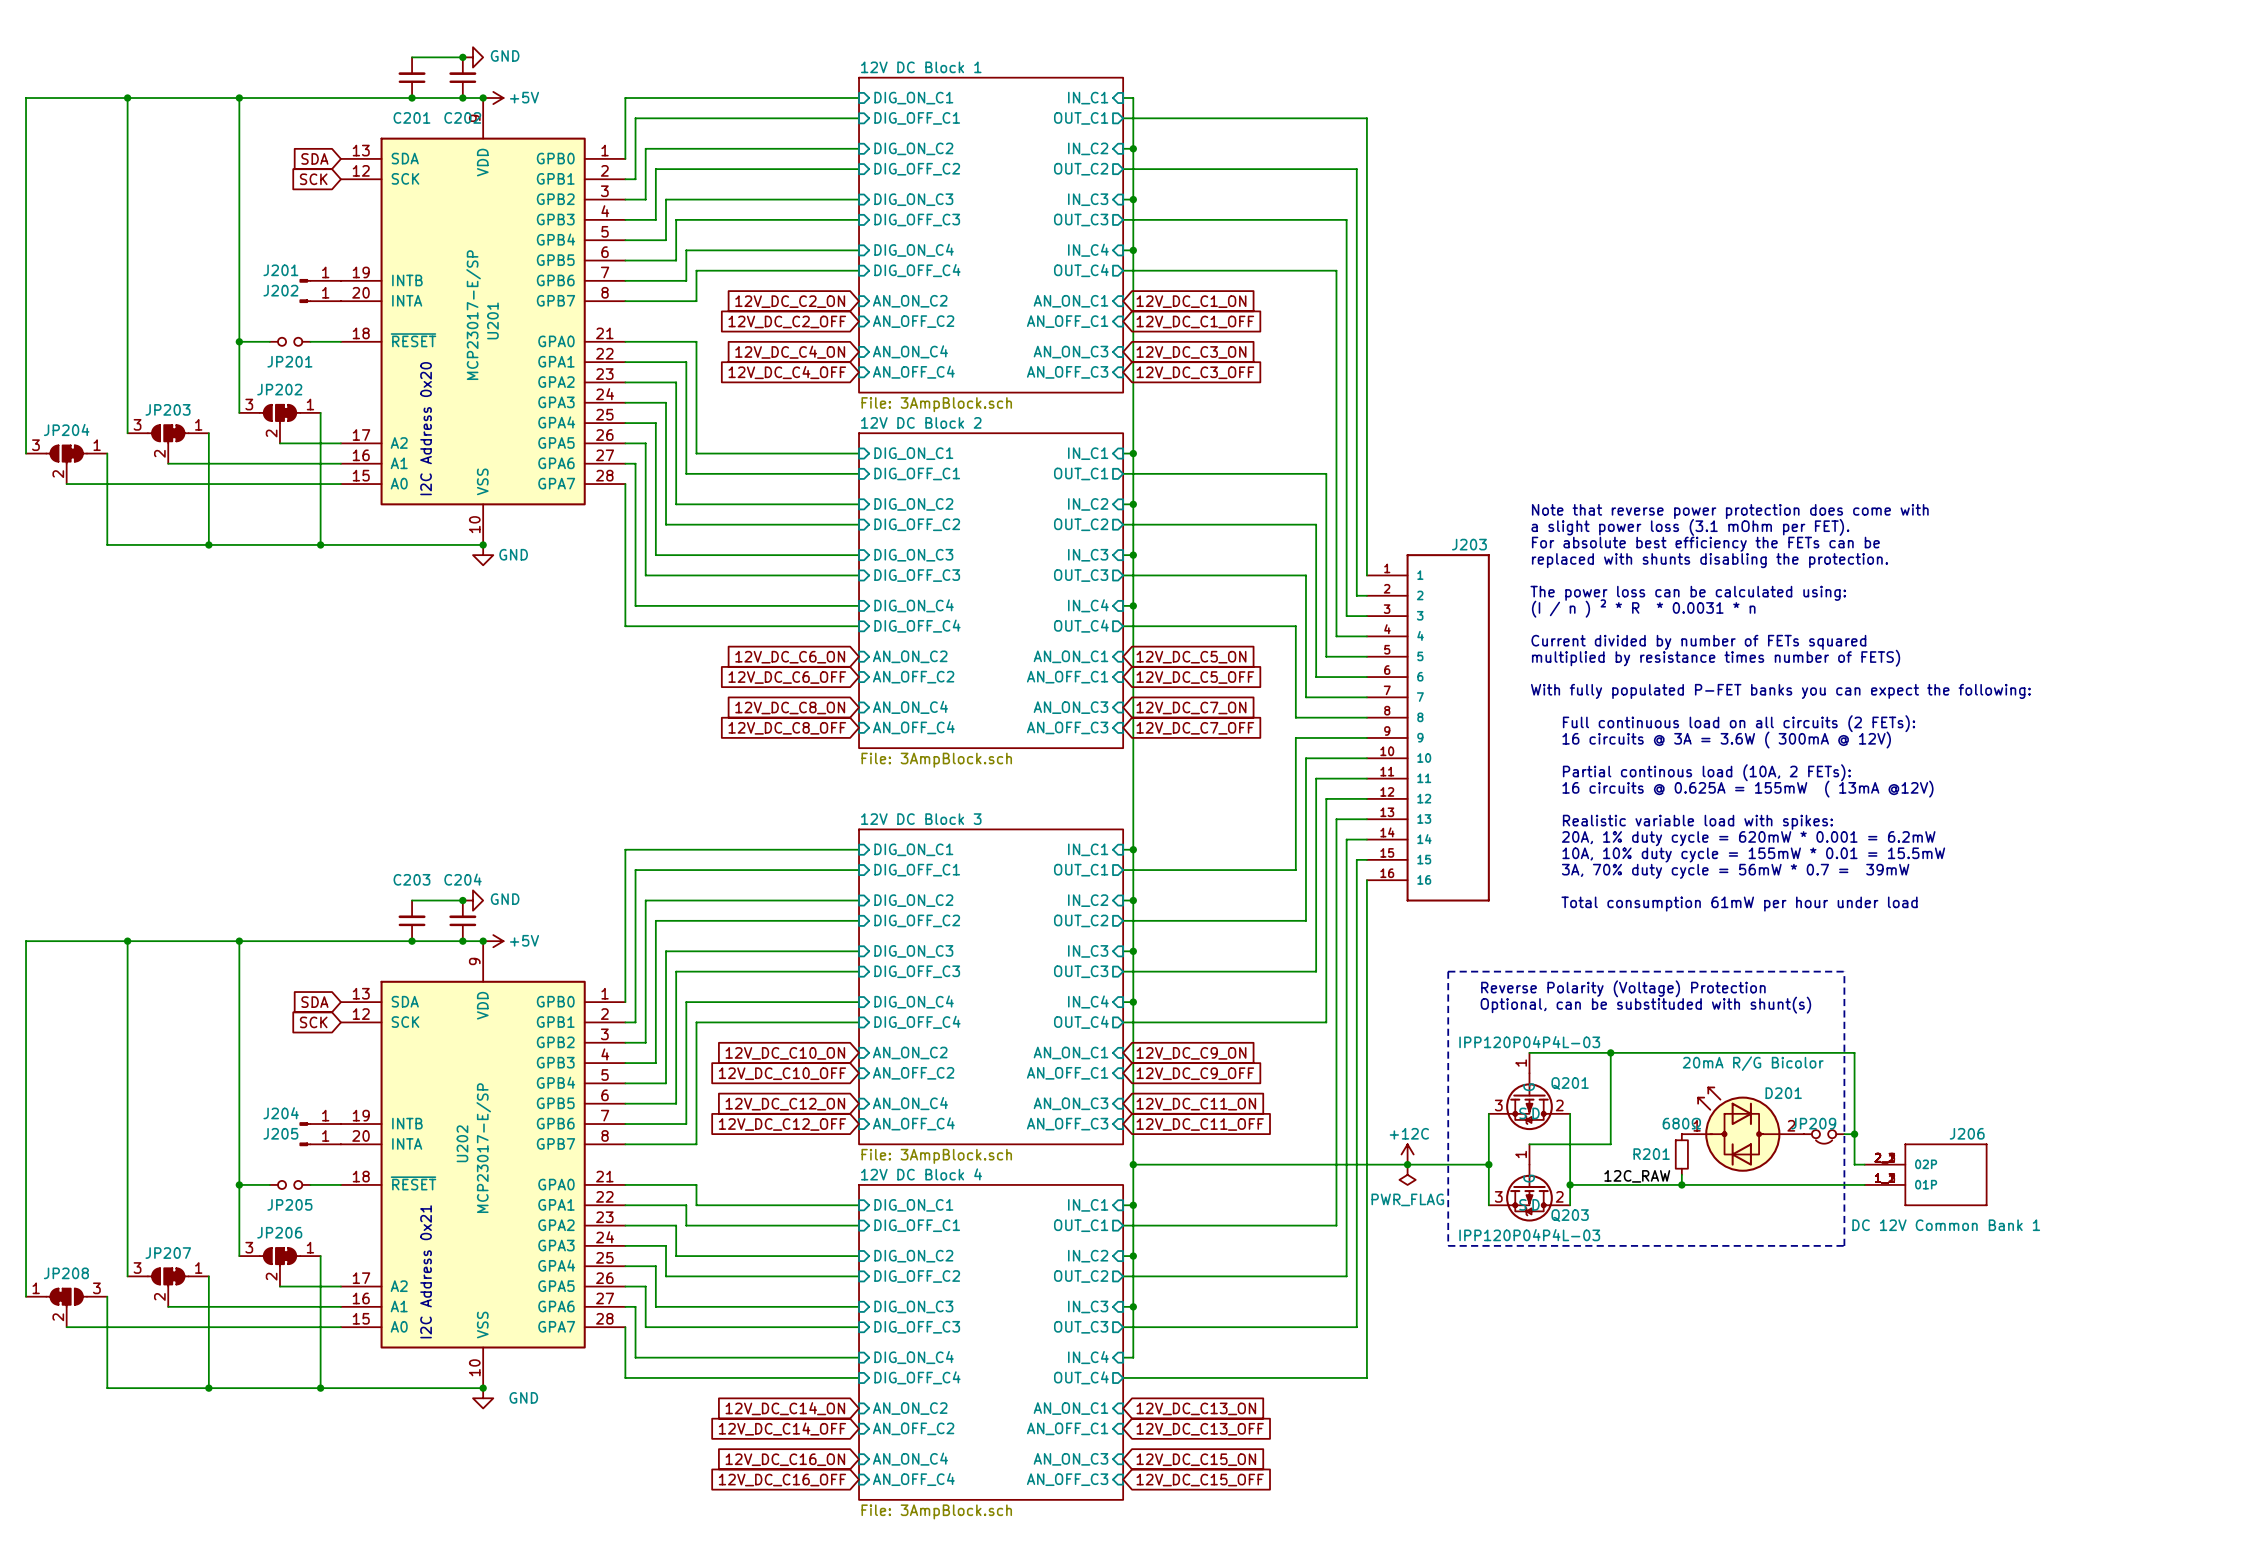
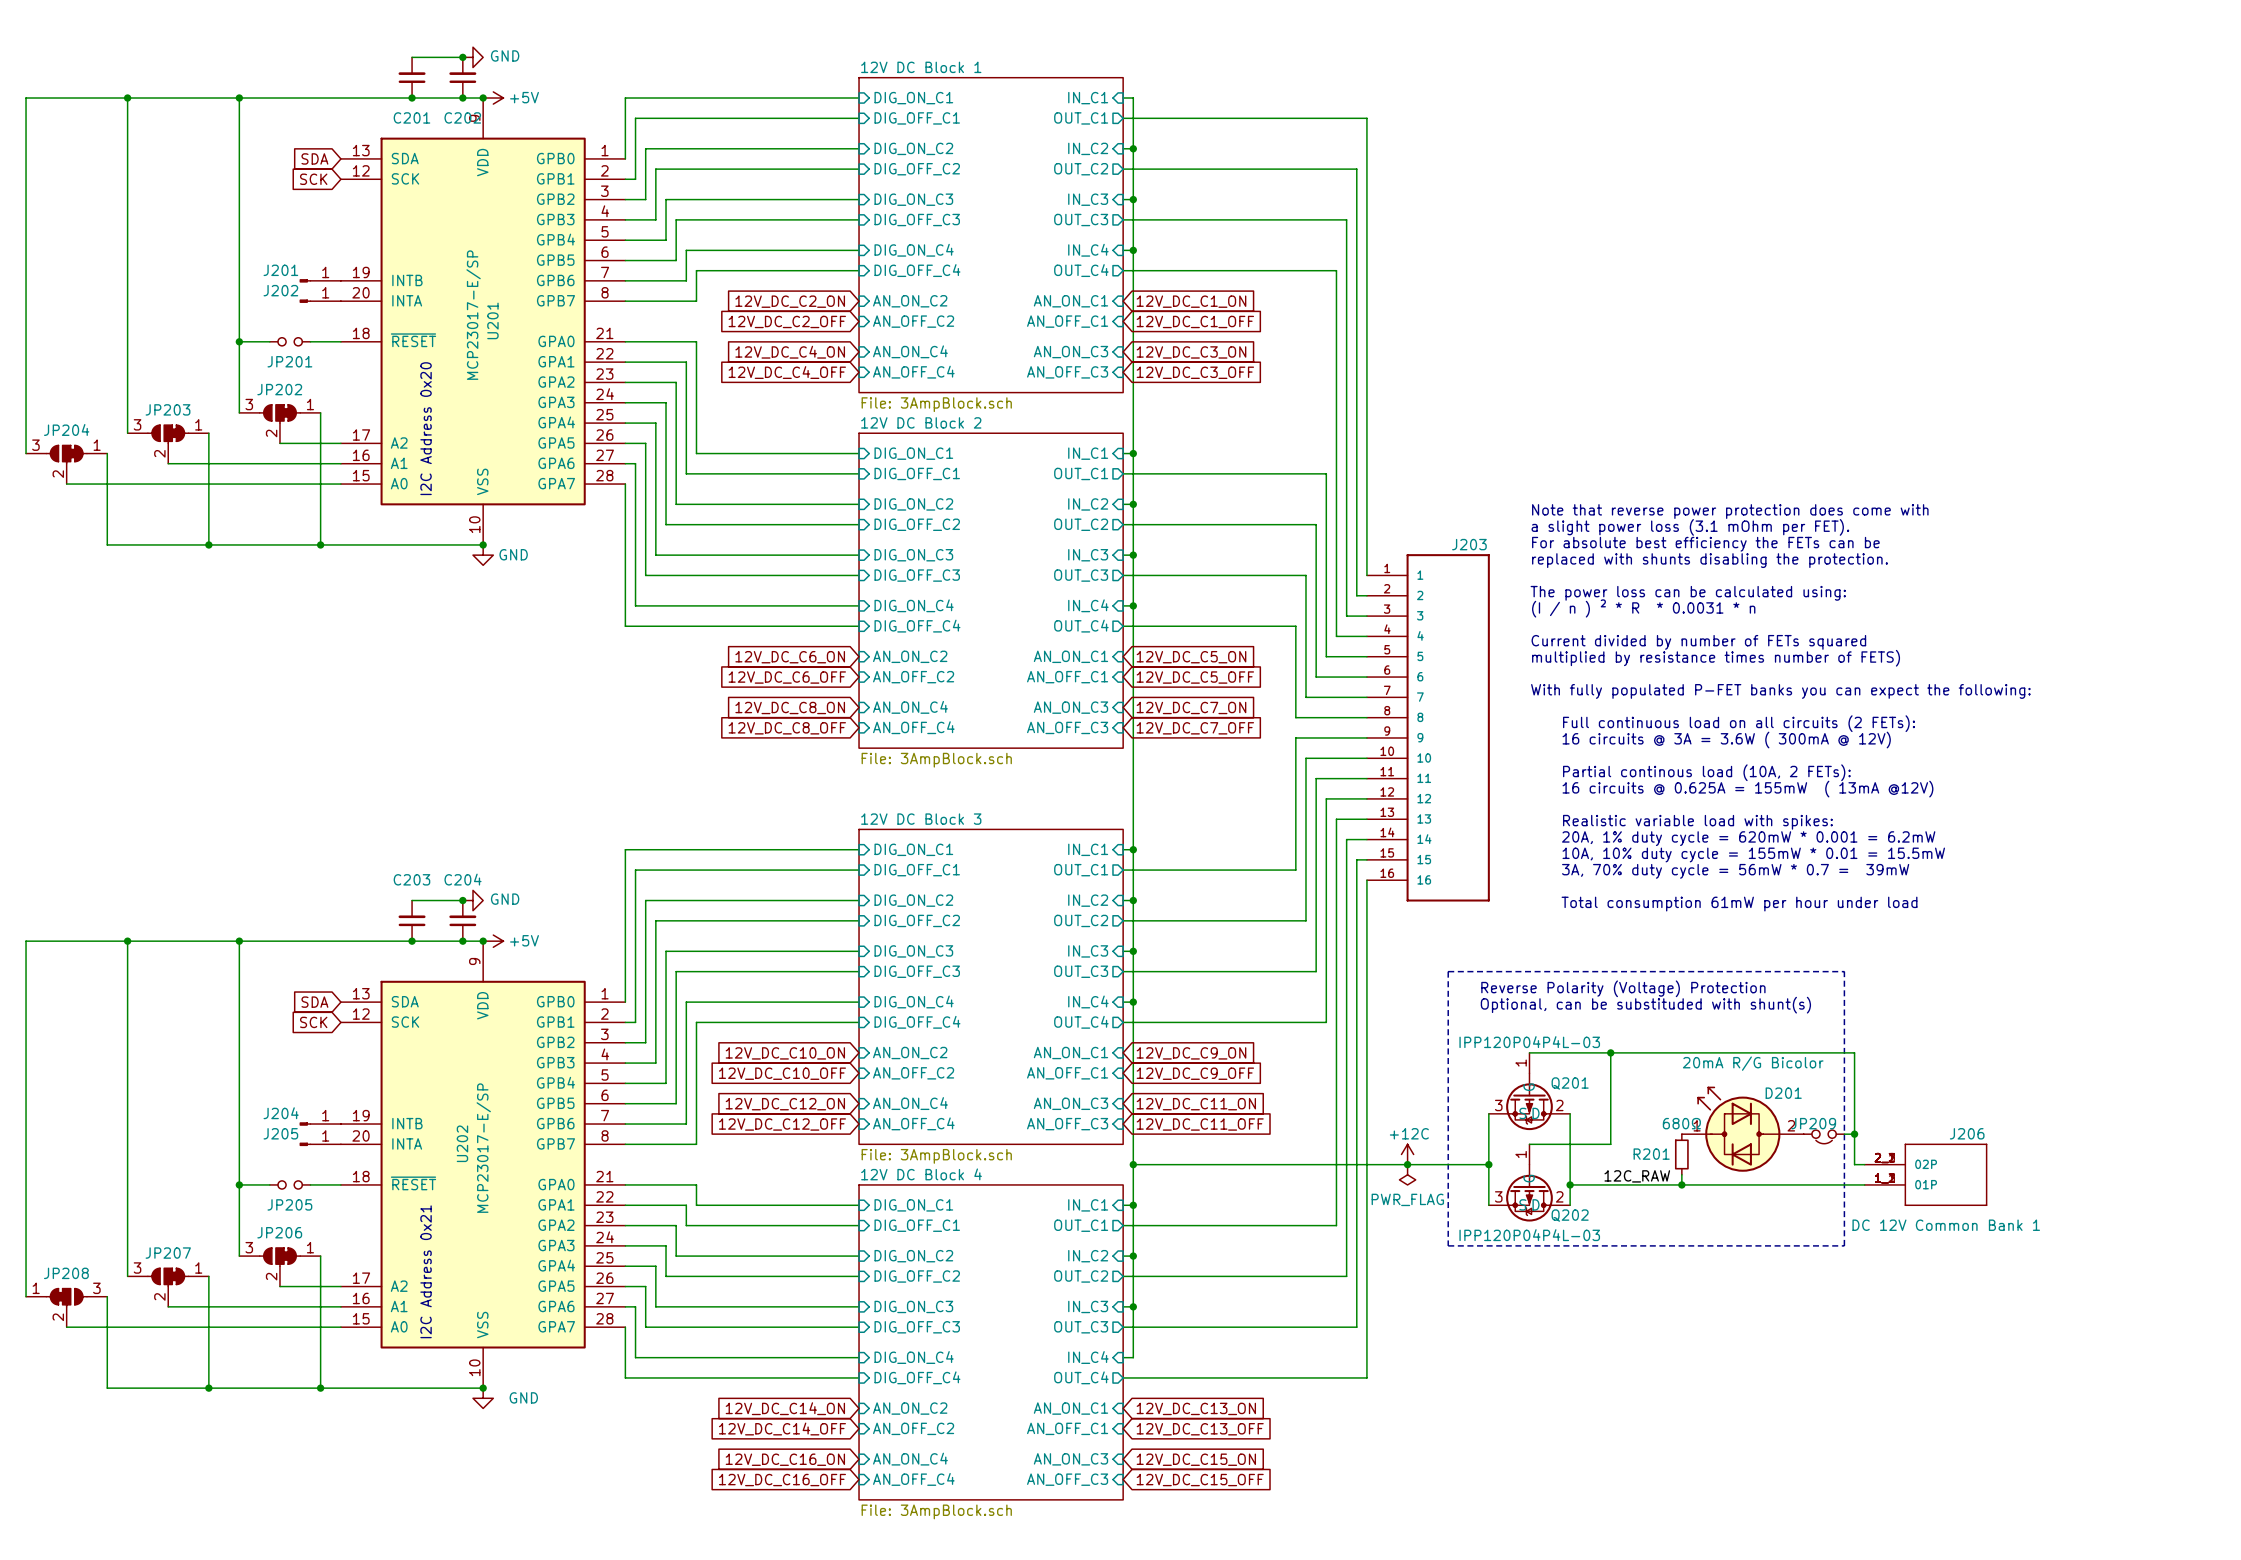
Q203 name: Q203 (1570, 1215) -> Q202 (1570, 1215)

